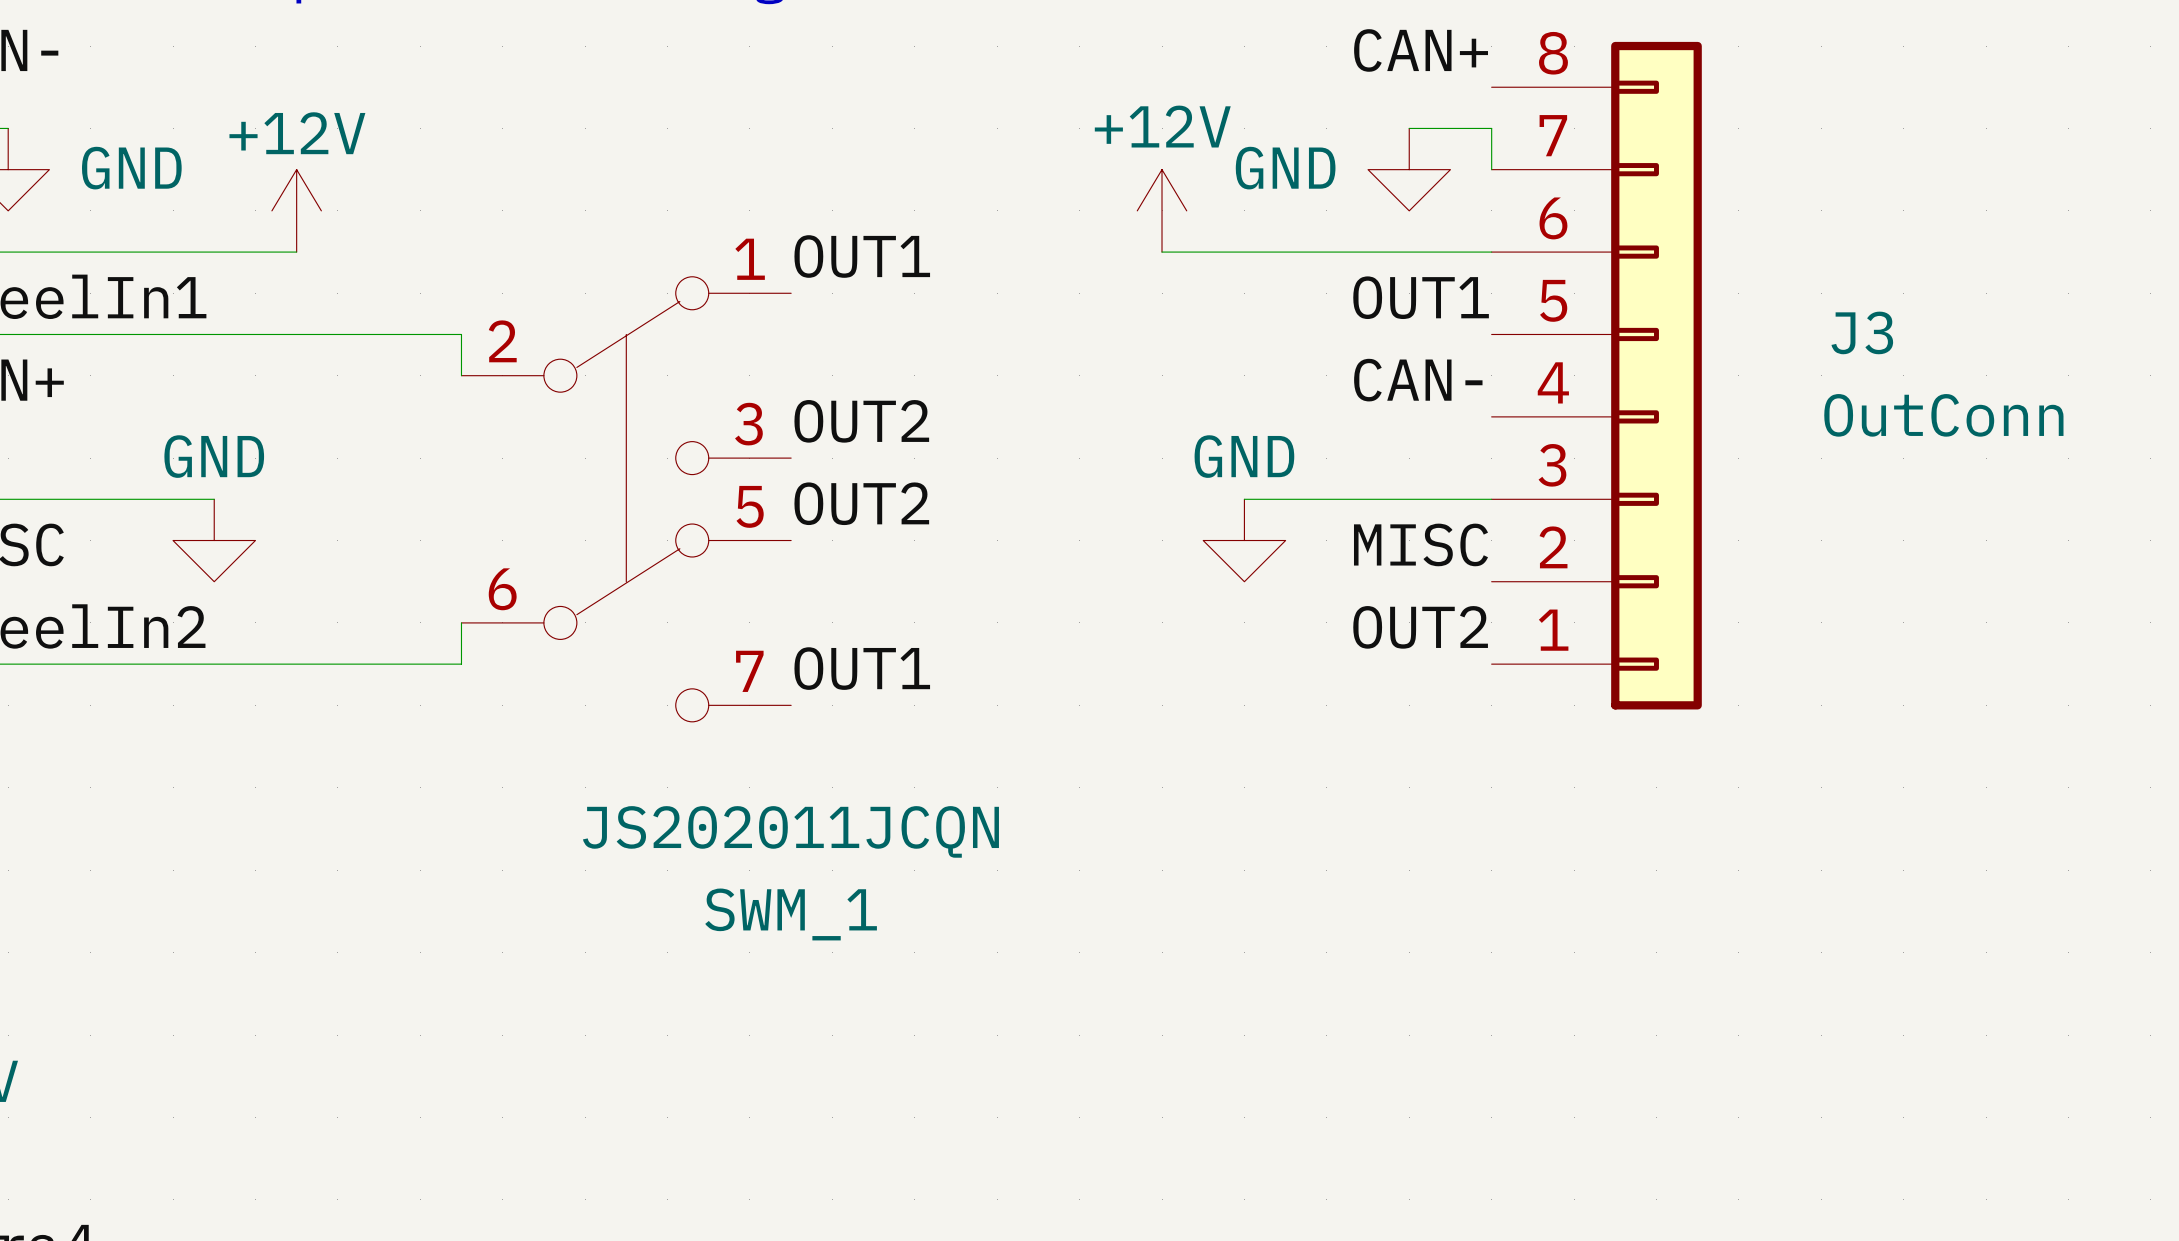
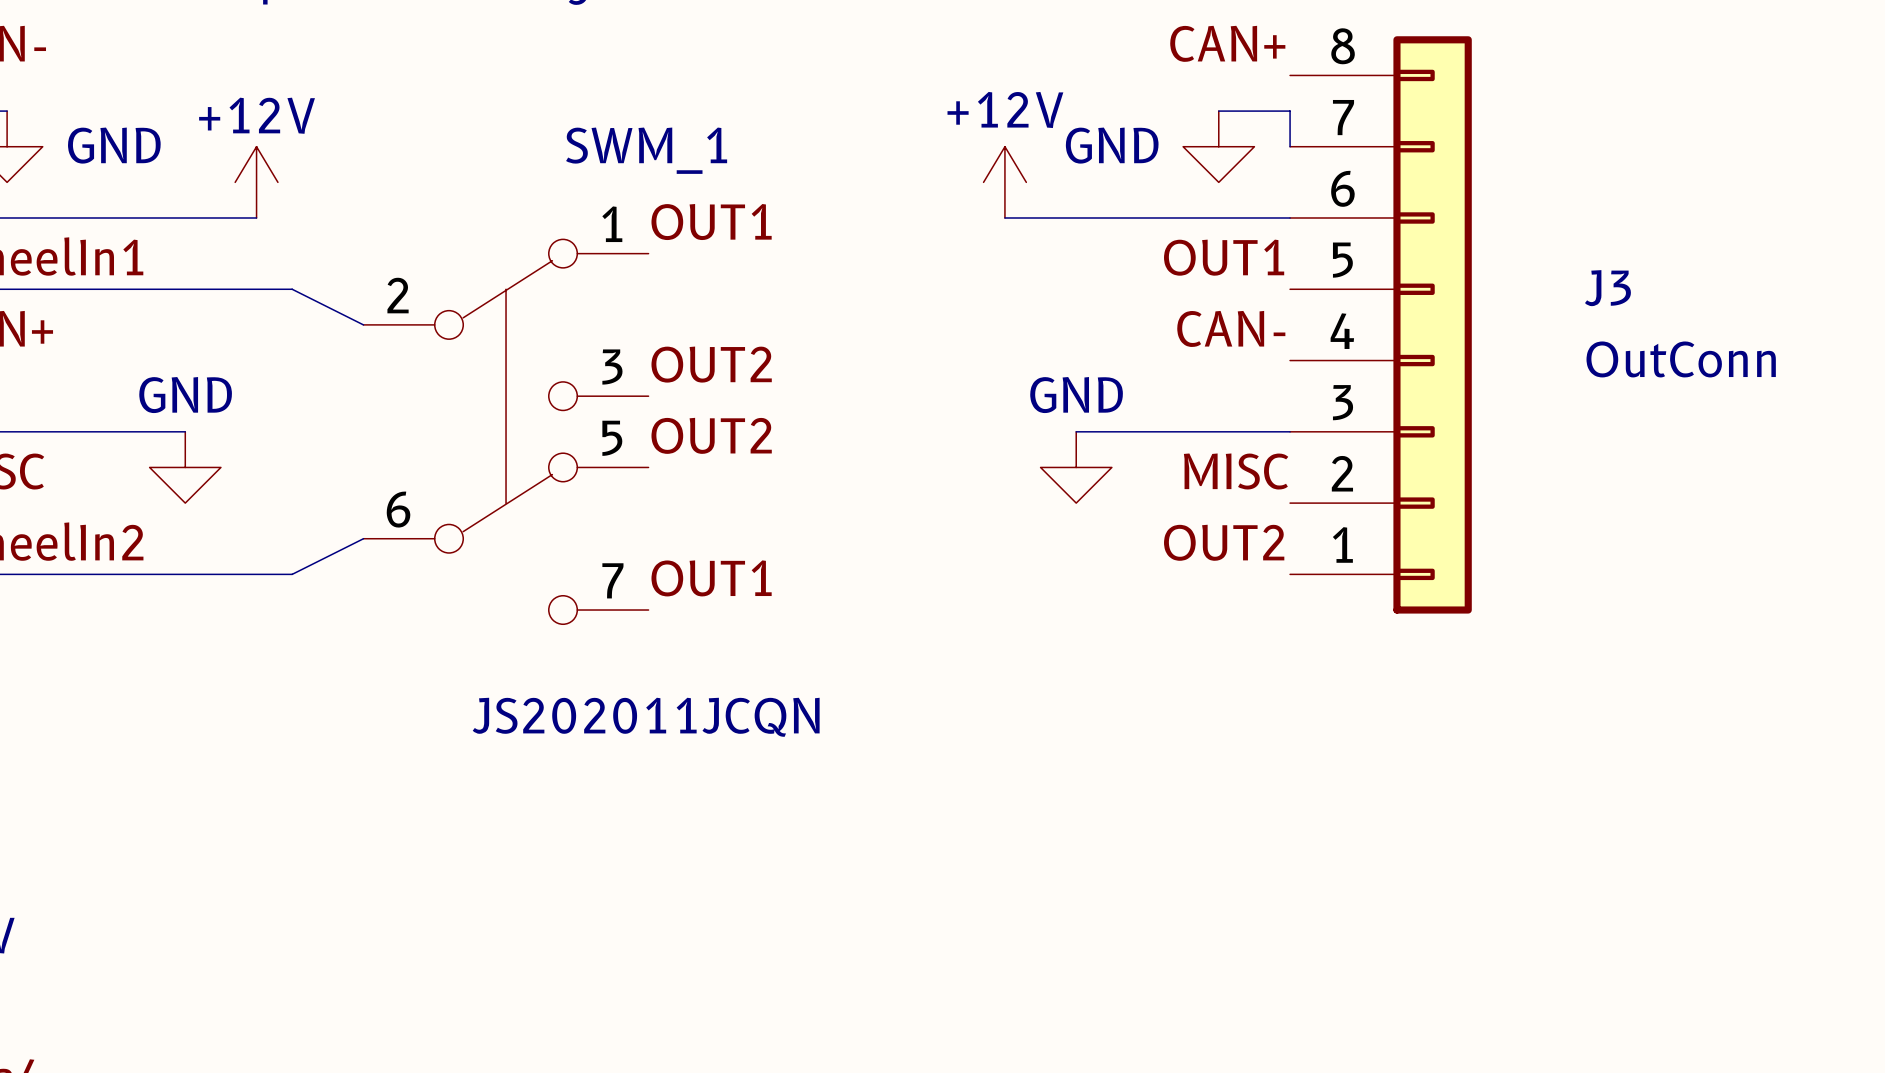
label position: OUT1 (862, 256) -> OUT1 (711, 222)
wire: (337, 334) (461, 334) (461, 375) -> (292, 289) (363, 324)
label position: OUT2 (861, 421) -> OUT2 (711, 364)
SWM_1 position: (626, 499) -> (506, 431)
label position: OUT2 (861, 503) -> OUT2 (711, 435)
wire: (461, 622) (461, 664) (337, 664) -> (363, 538) (292, 574)
label position: OUT1 (862, 668) -> OUT1 (711, 578)
SWM_1 name position: SWM_1 (791, 914) -> SWM_1 (646, 150)

